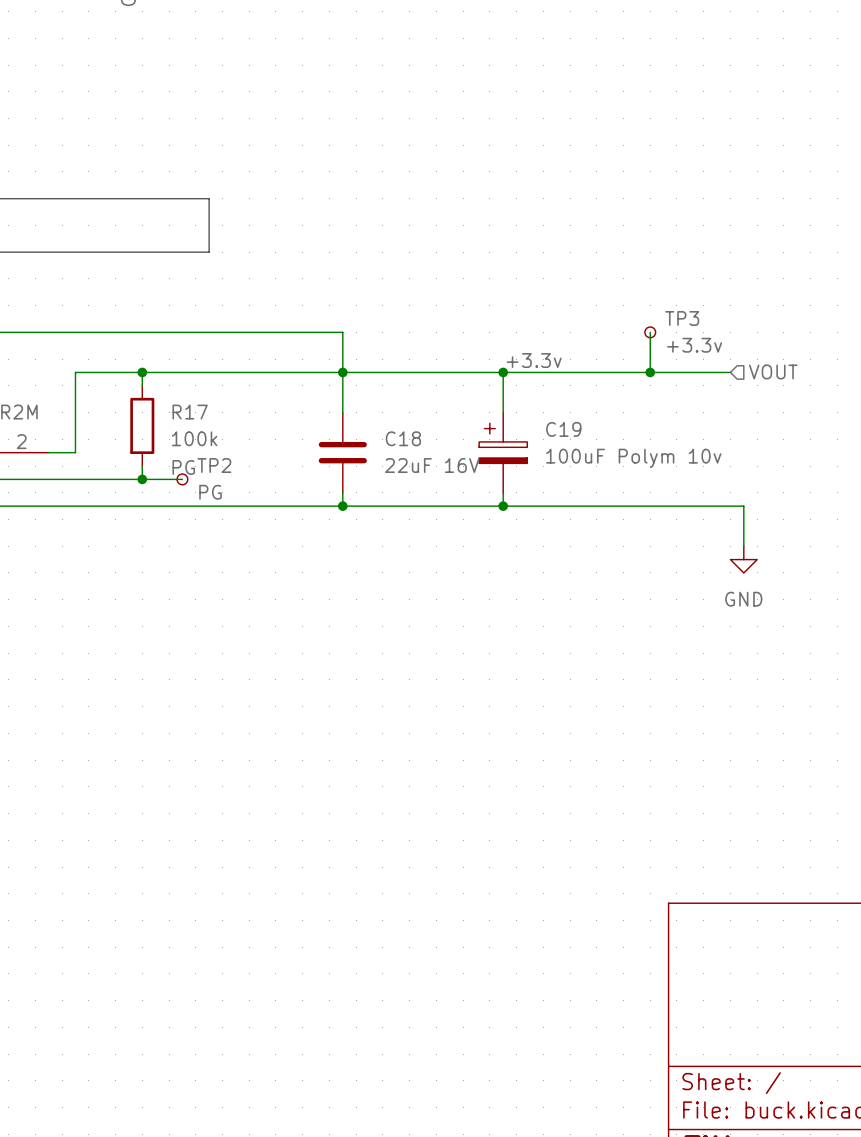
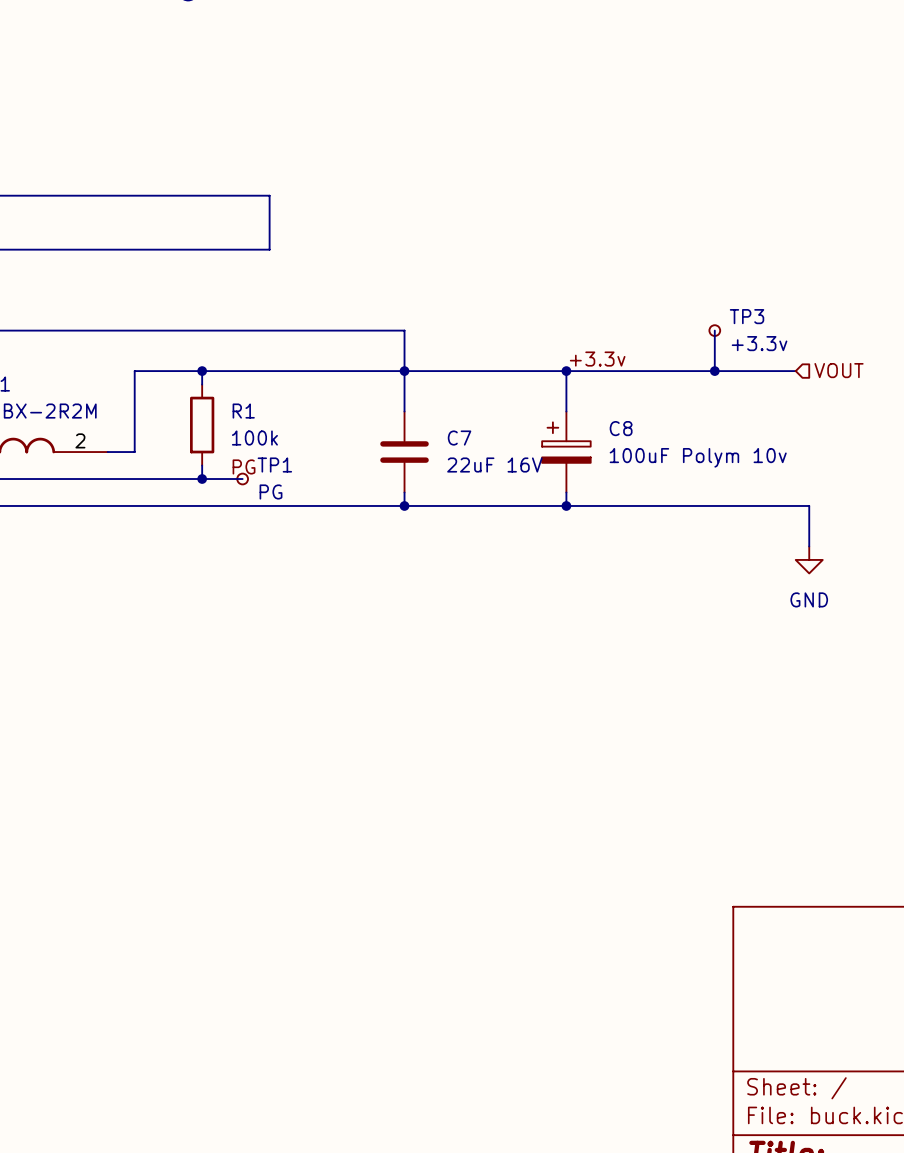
R17 name: R17 (190, 412) -> R1 (243, 411)
C19 name: C19 (563, 429) -> C8 (621, 428)
C18 name: C18 (403, 438) -> C7 (459, 438)
TP2 name: TP2 (214, 465) -> TP1 (274, 465)

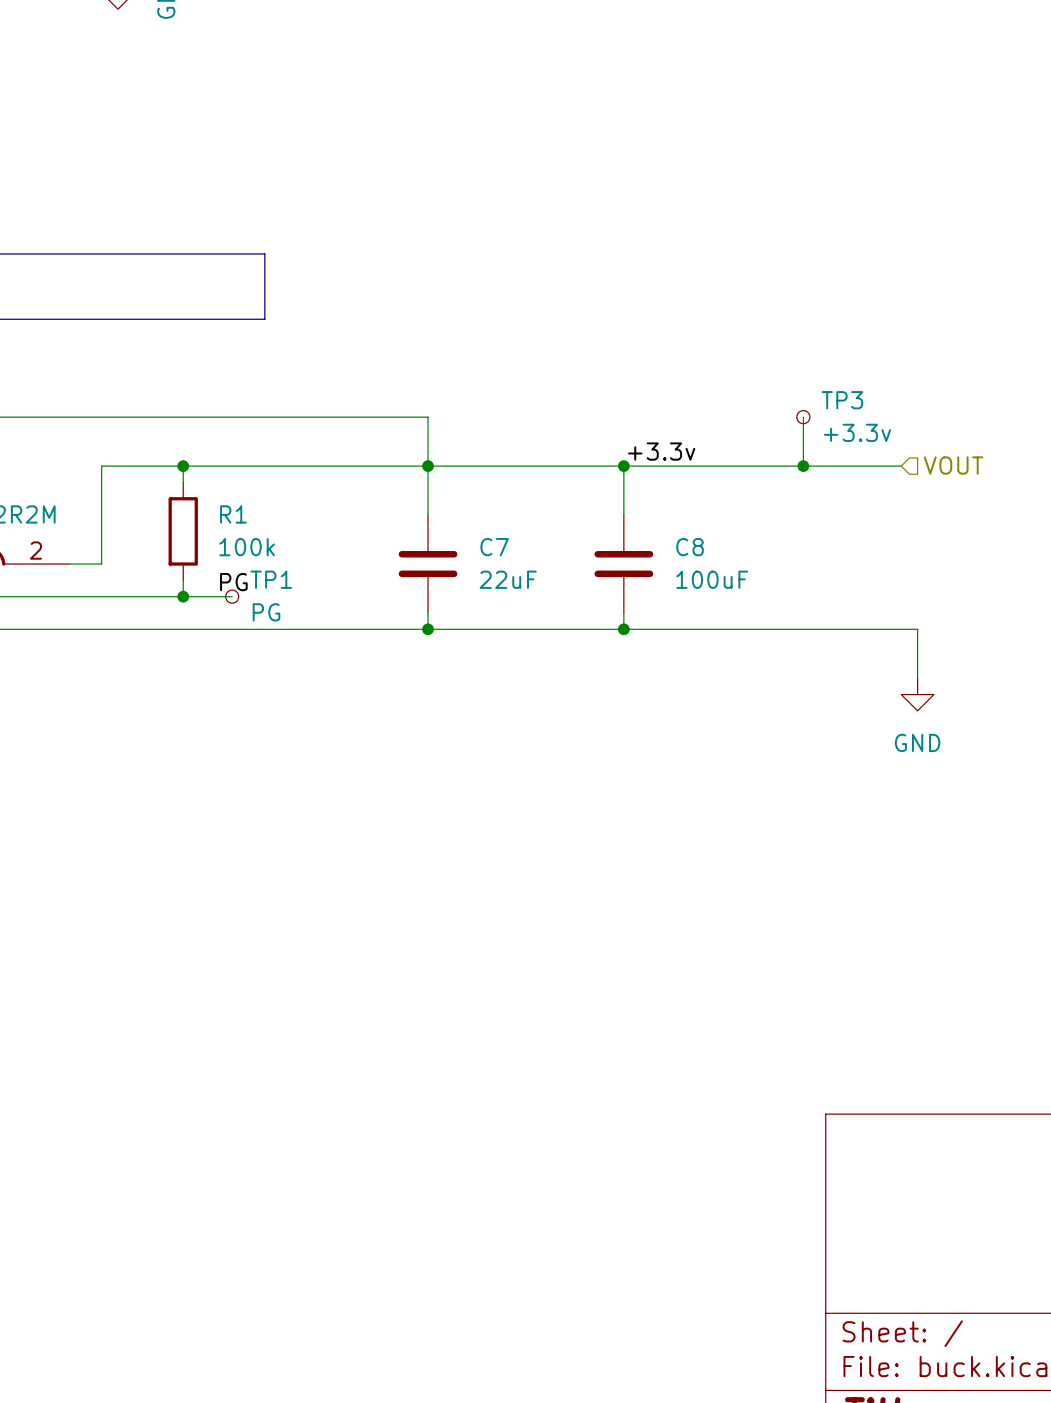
C8 symbol: [542, 411, 591, 493] -> [594, 515, 654, 613]
C8 value: 100uF Polym 10v (698, 457) -> 100uF (712, 579)
C7 value: 22uF 16V (494, 465) -> 22uF (508, 579)

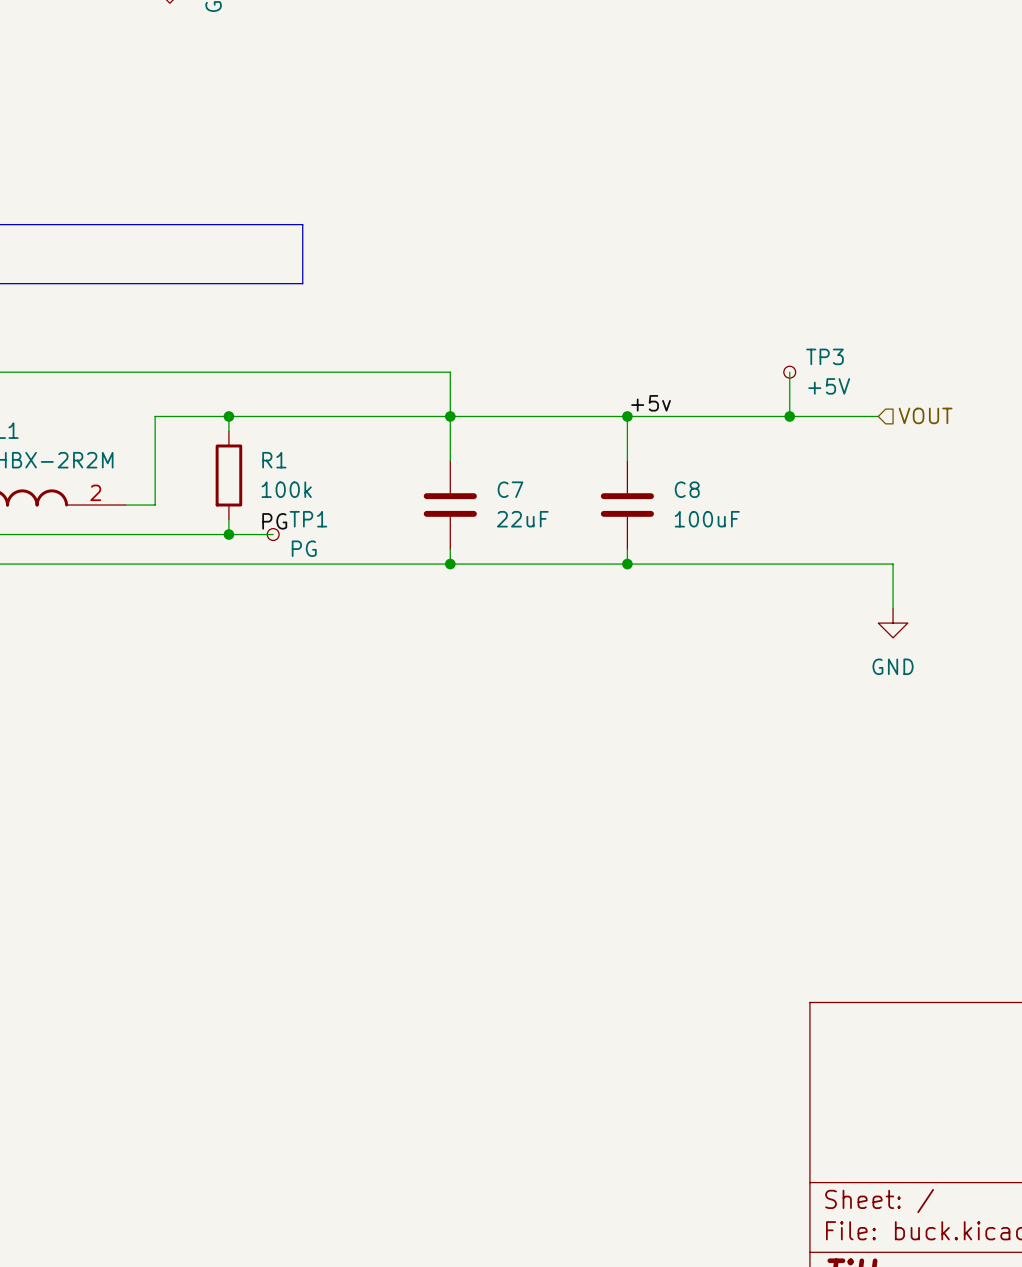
TP3 value: +3.3v (857, 432) -> +5V (829, 386)
label: +3.3v (661, 451) -> +5v (651, 403)

